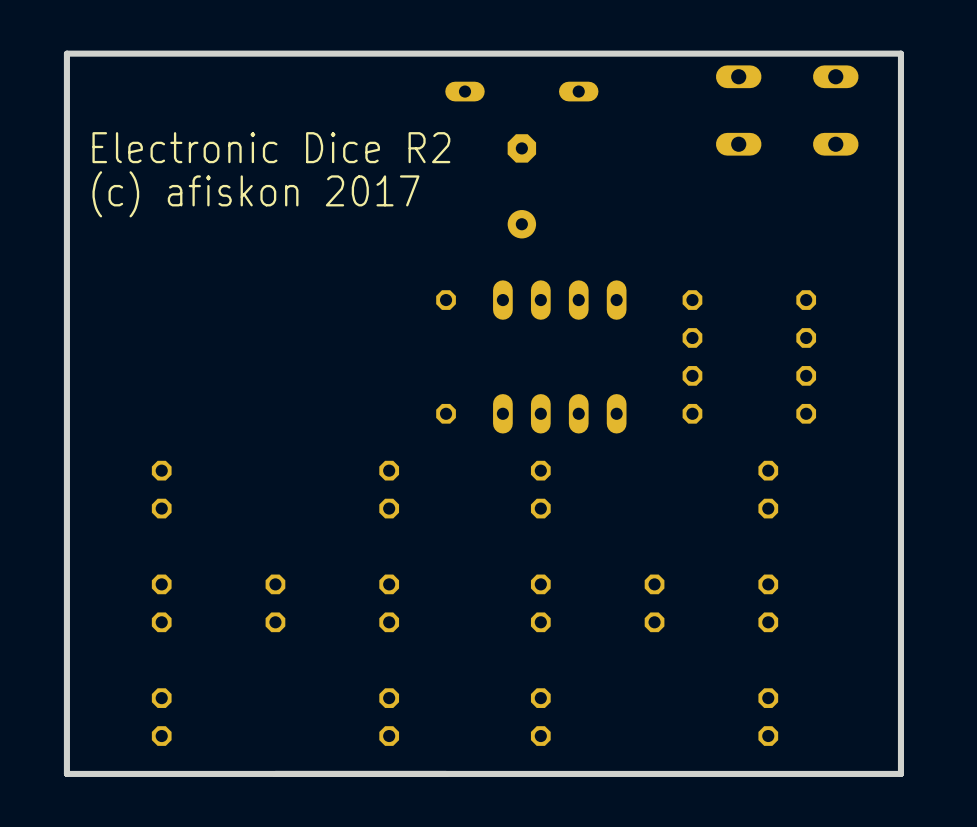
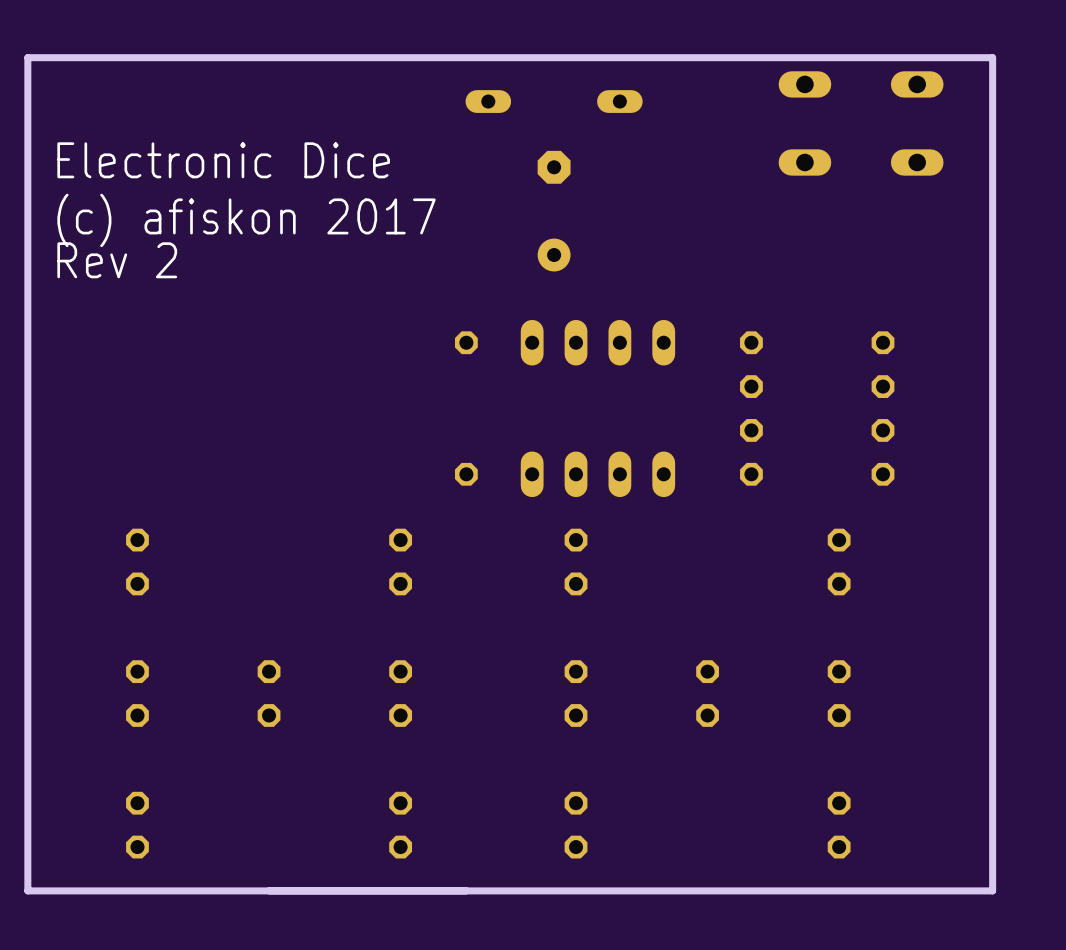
text: Electronic Dice R2 (271, 147) -> Electronic Dice (223, 160)
text: none -> Rev 2 (117, 260)

